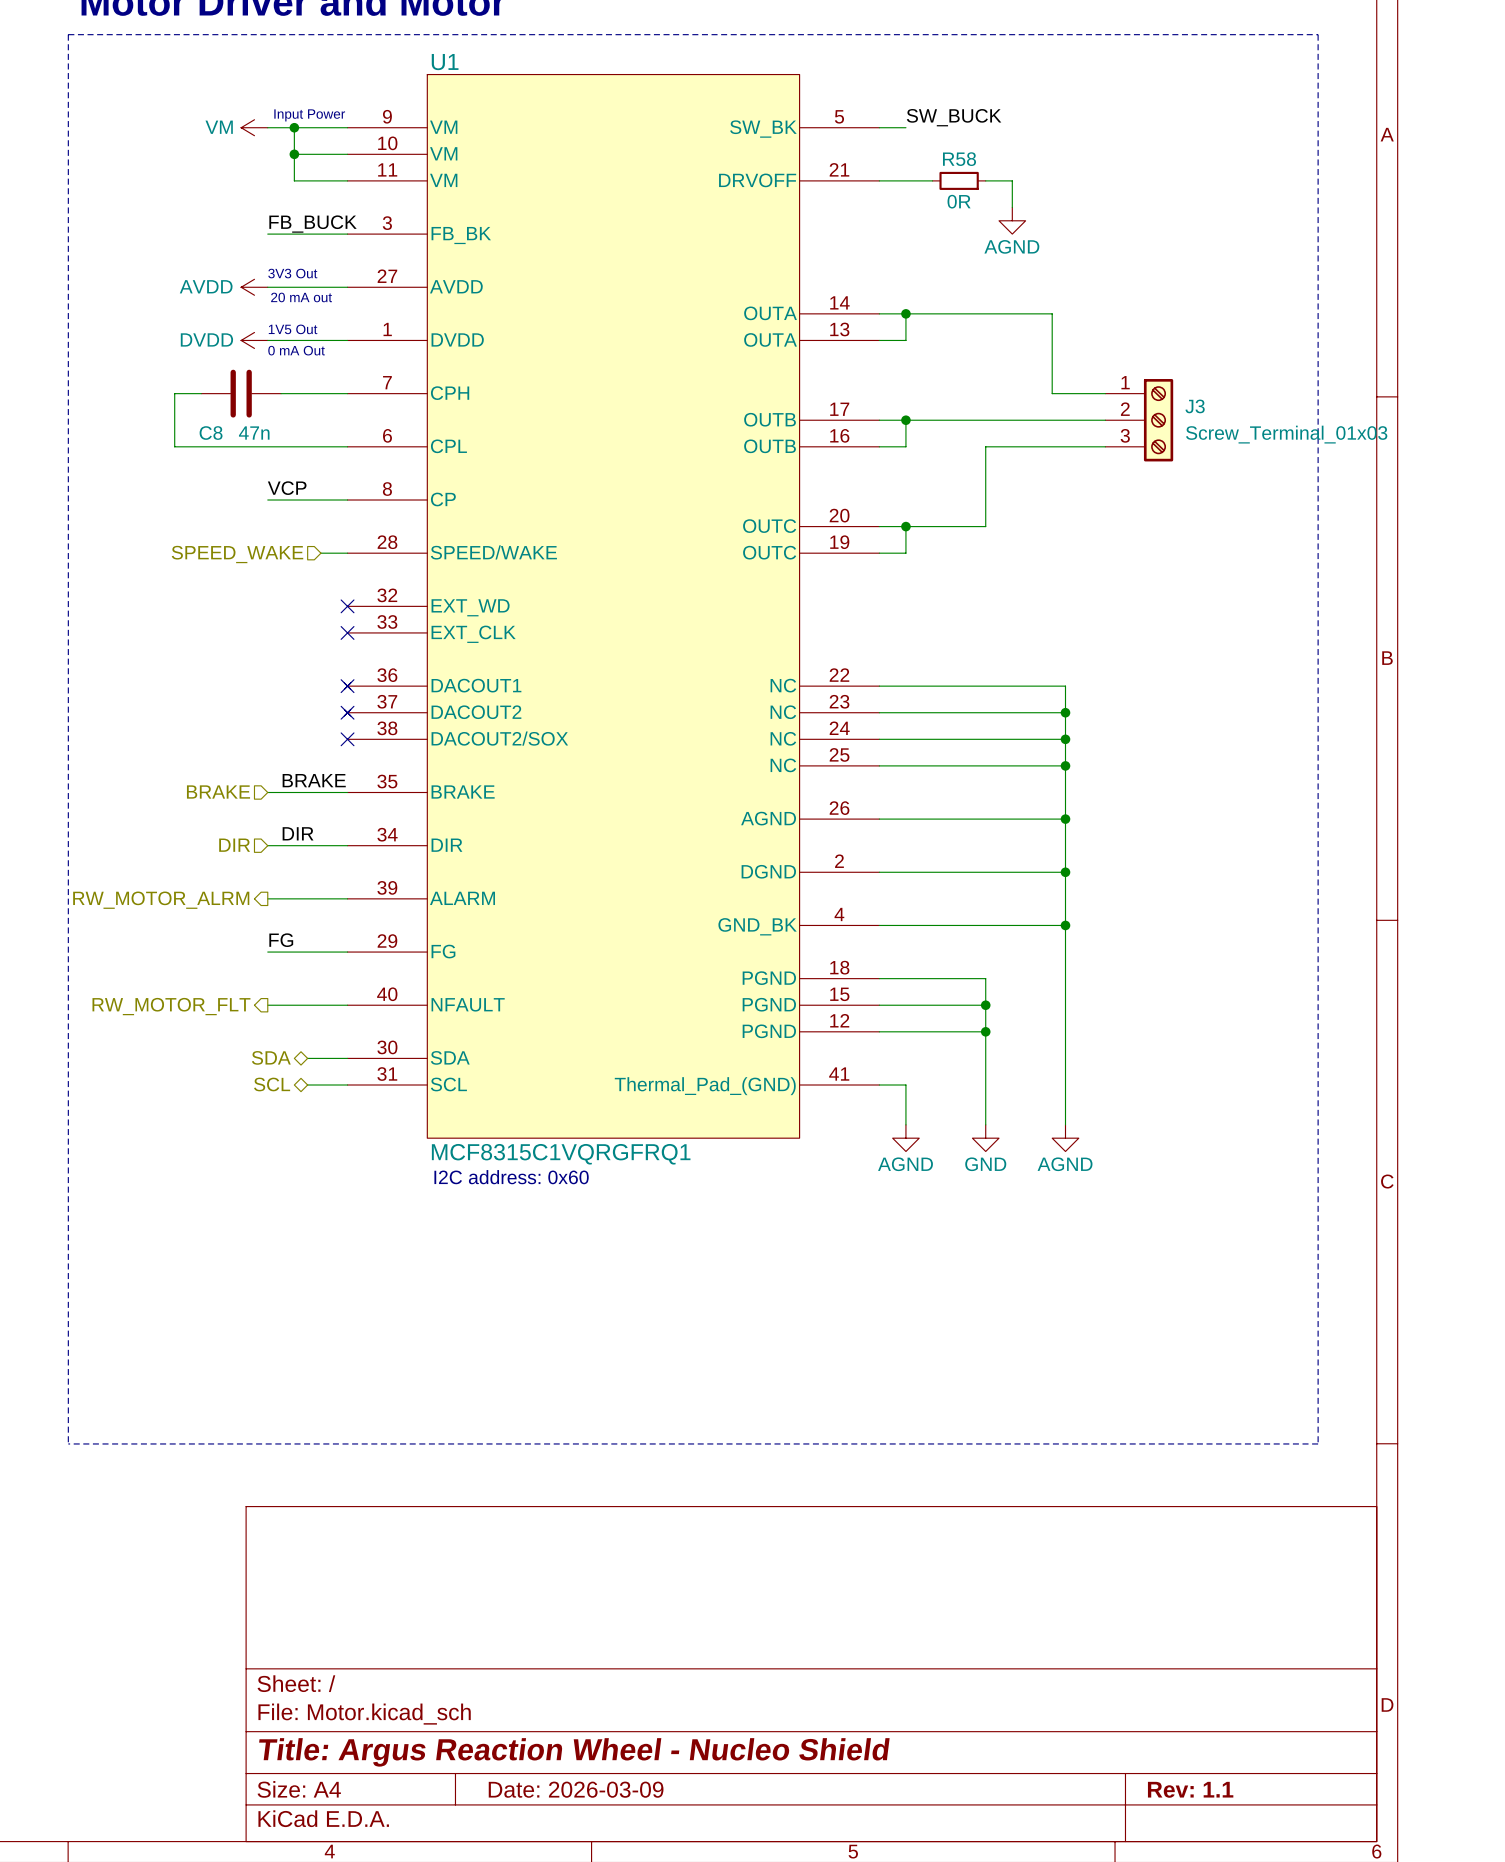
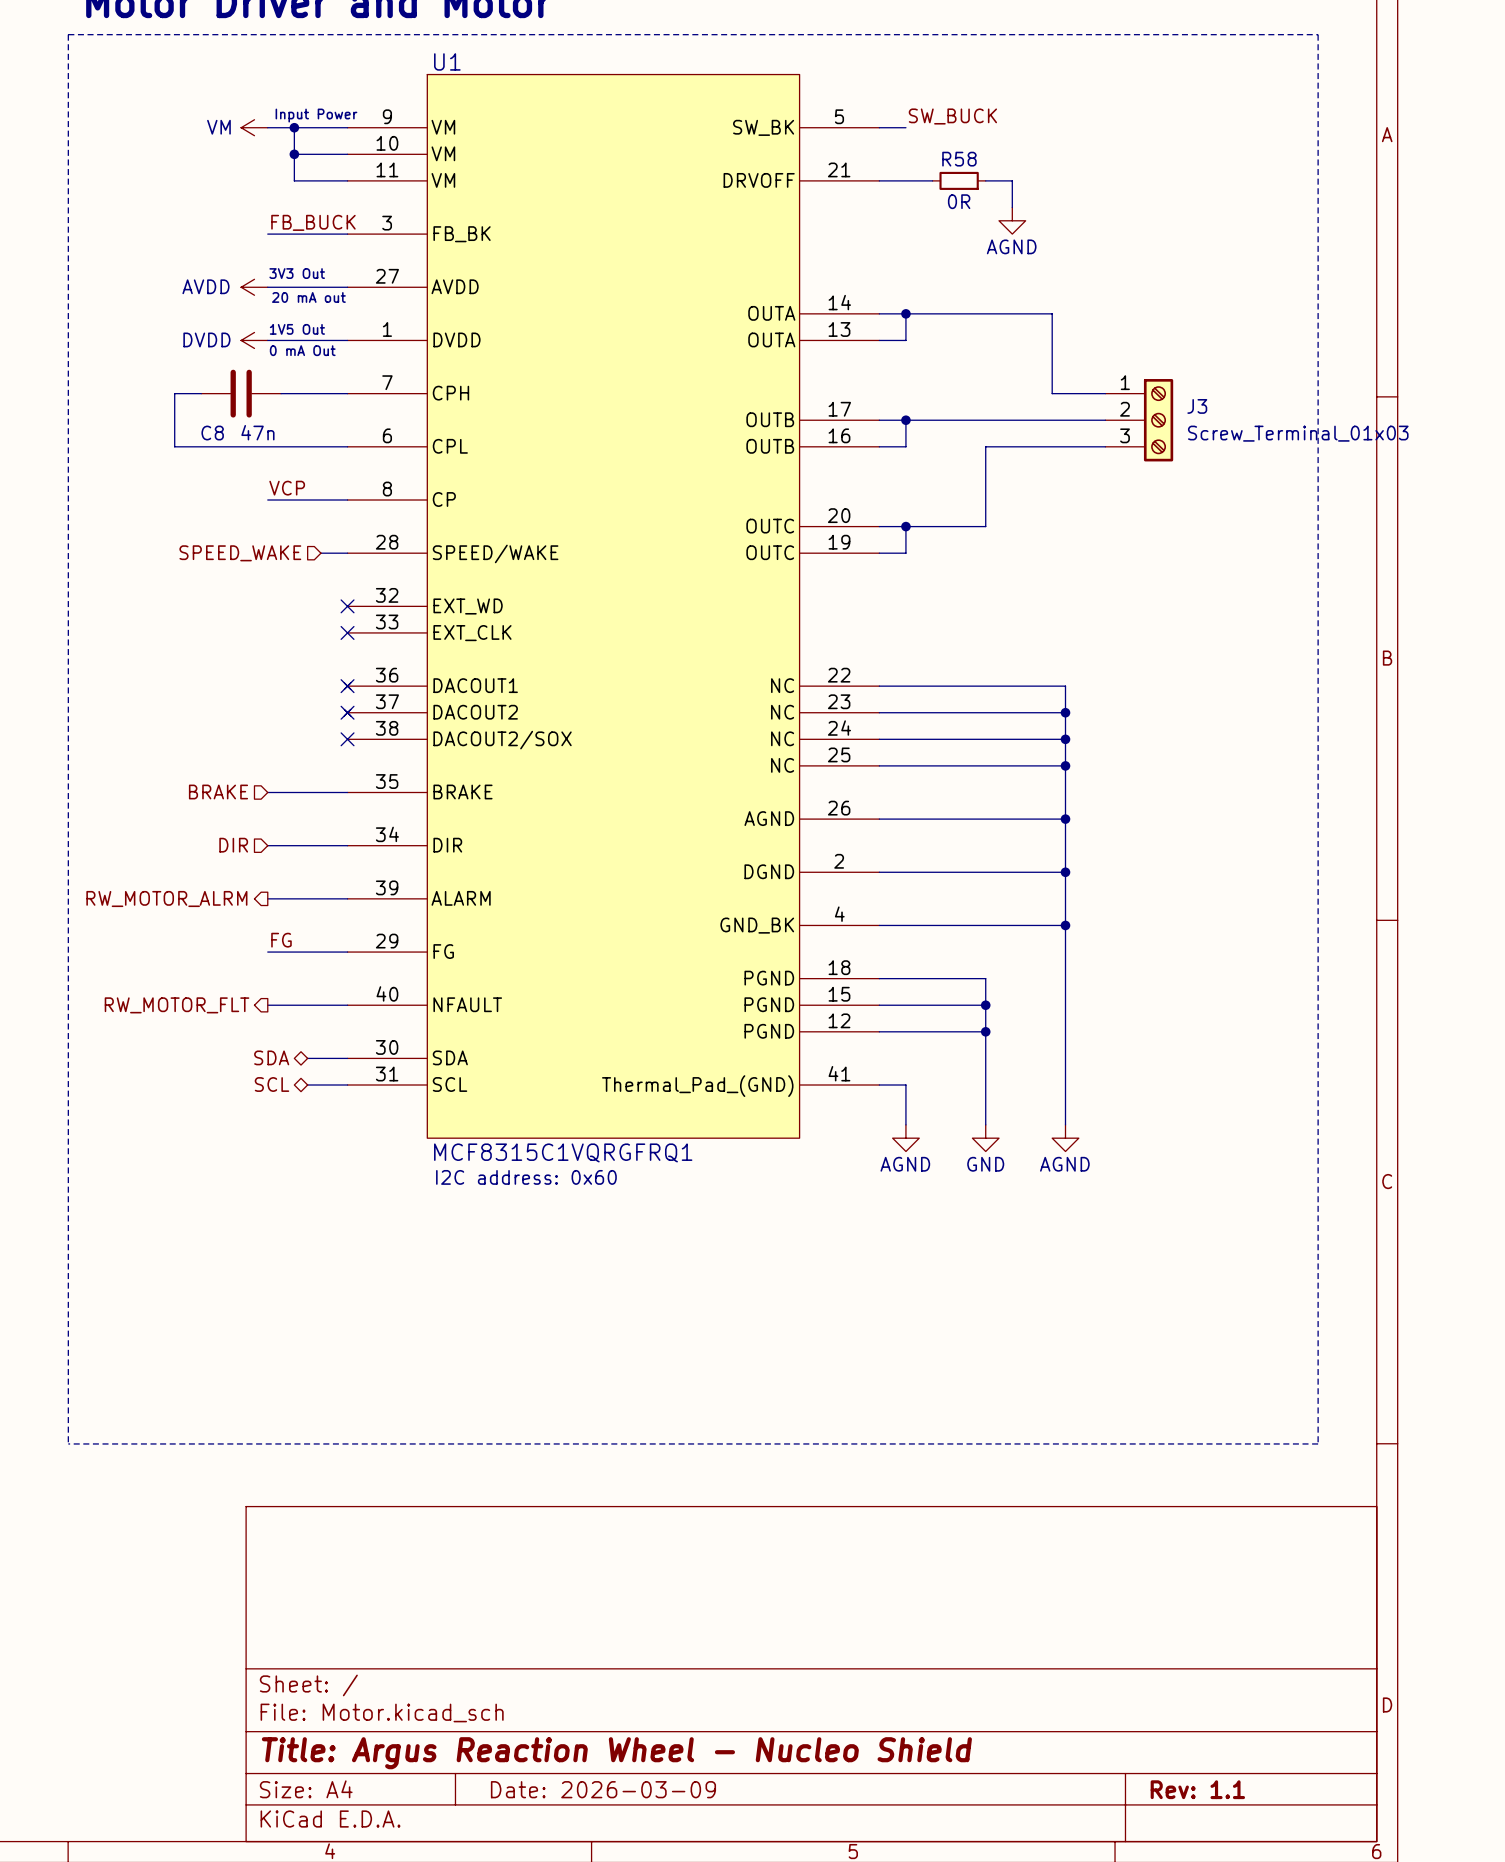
label: BRAKE (314, 780) -> none
label: DIR (298, 833) -> none

